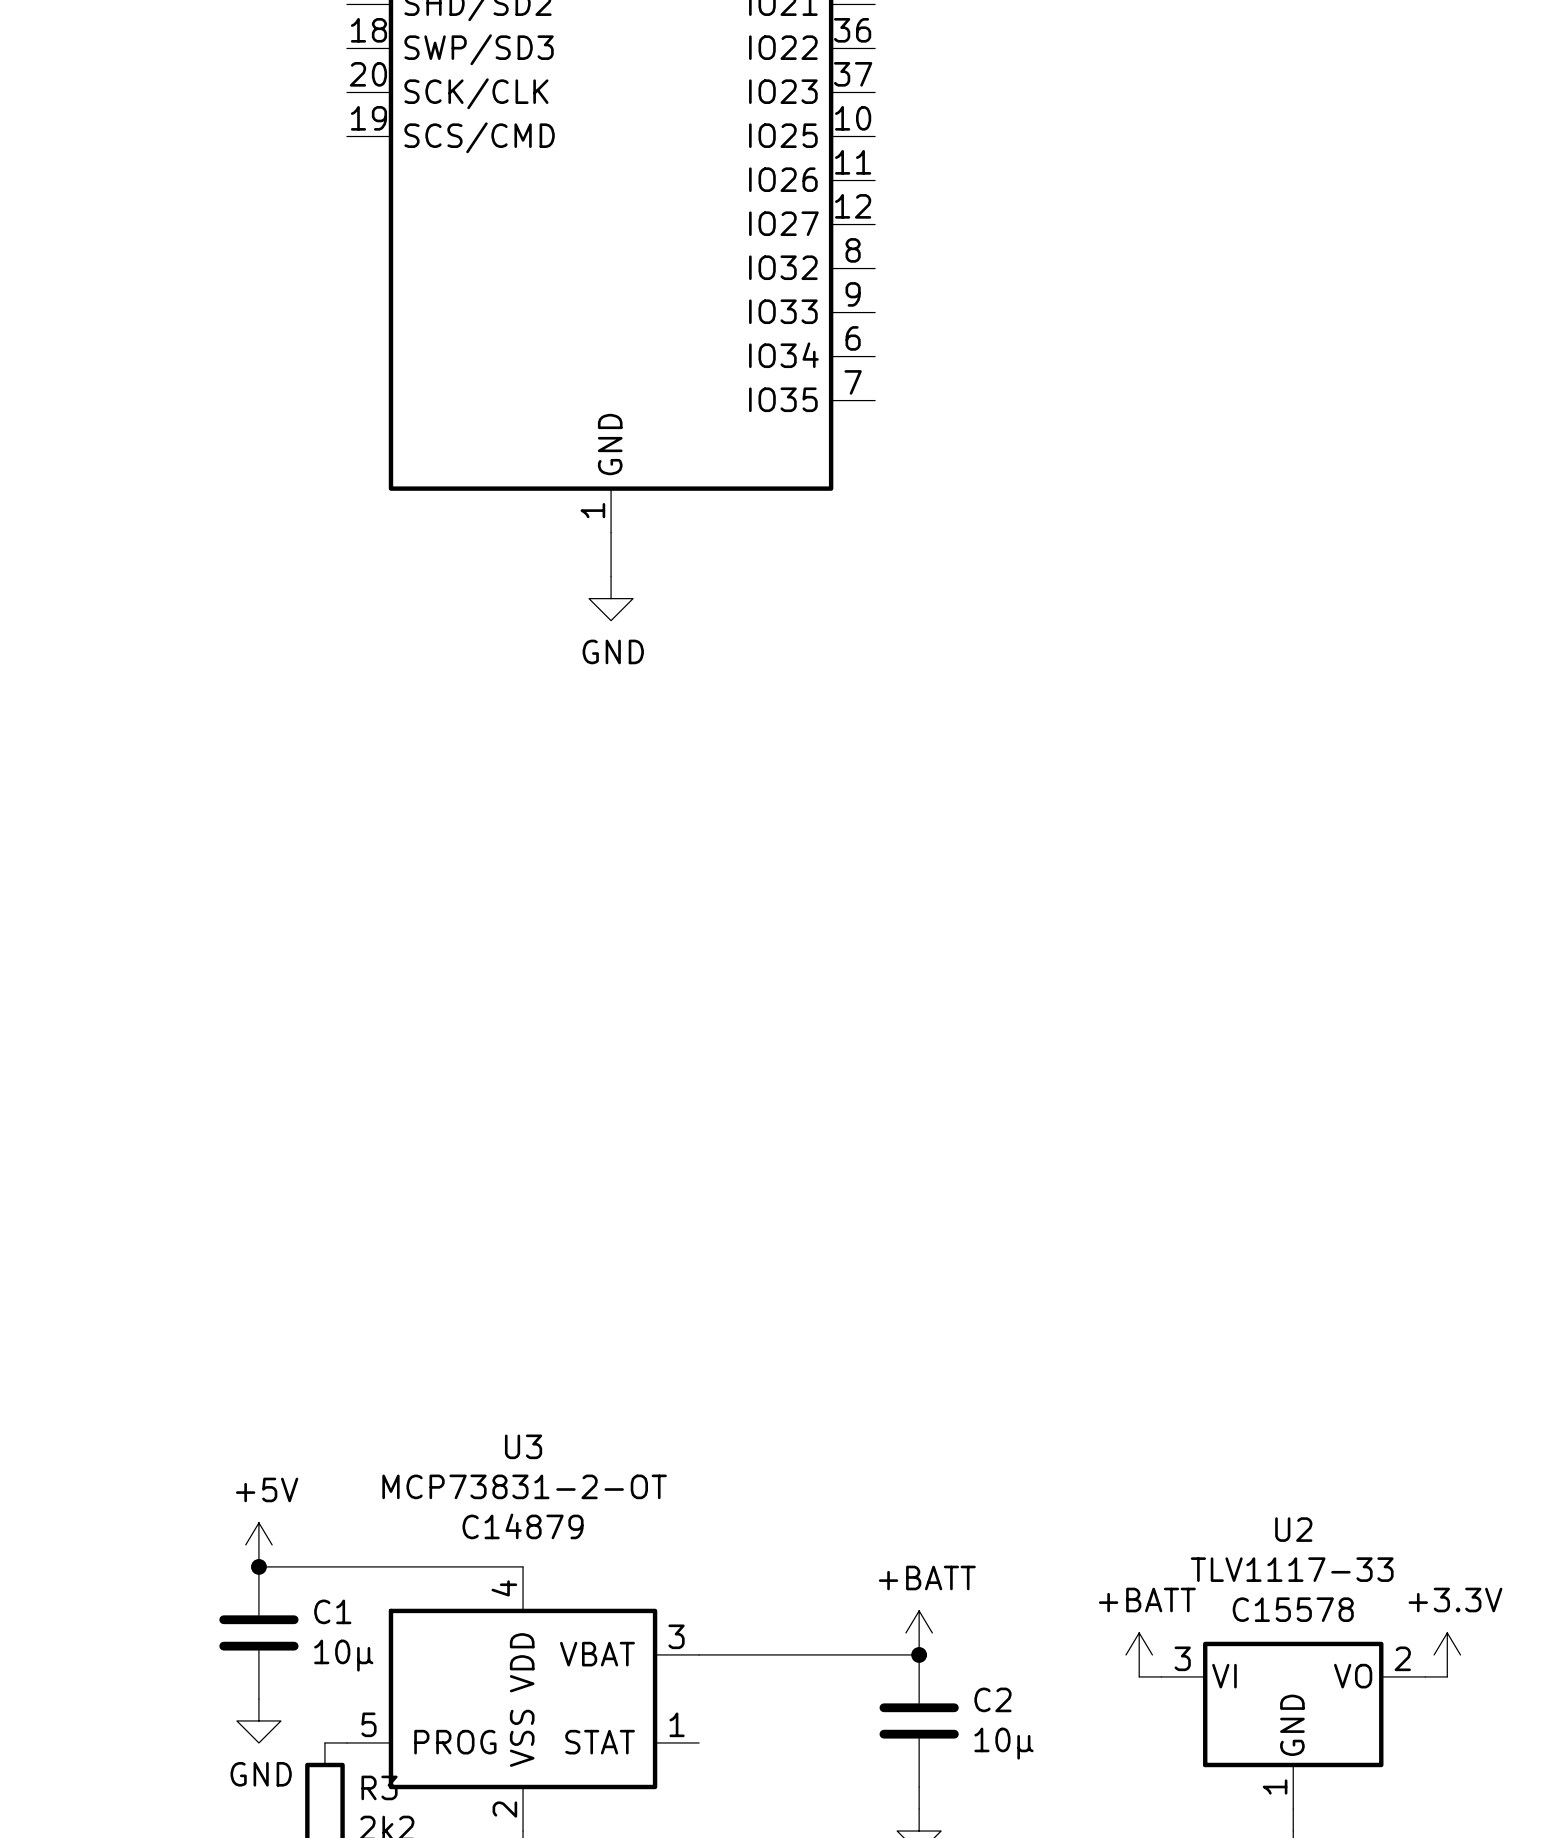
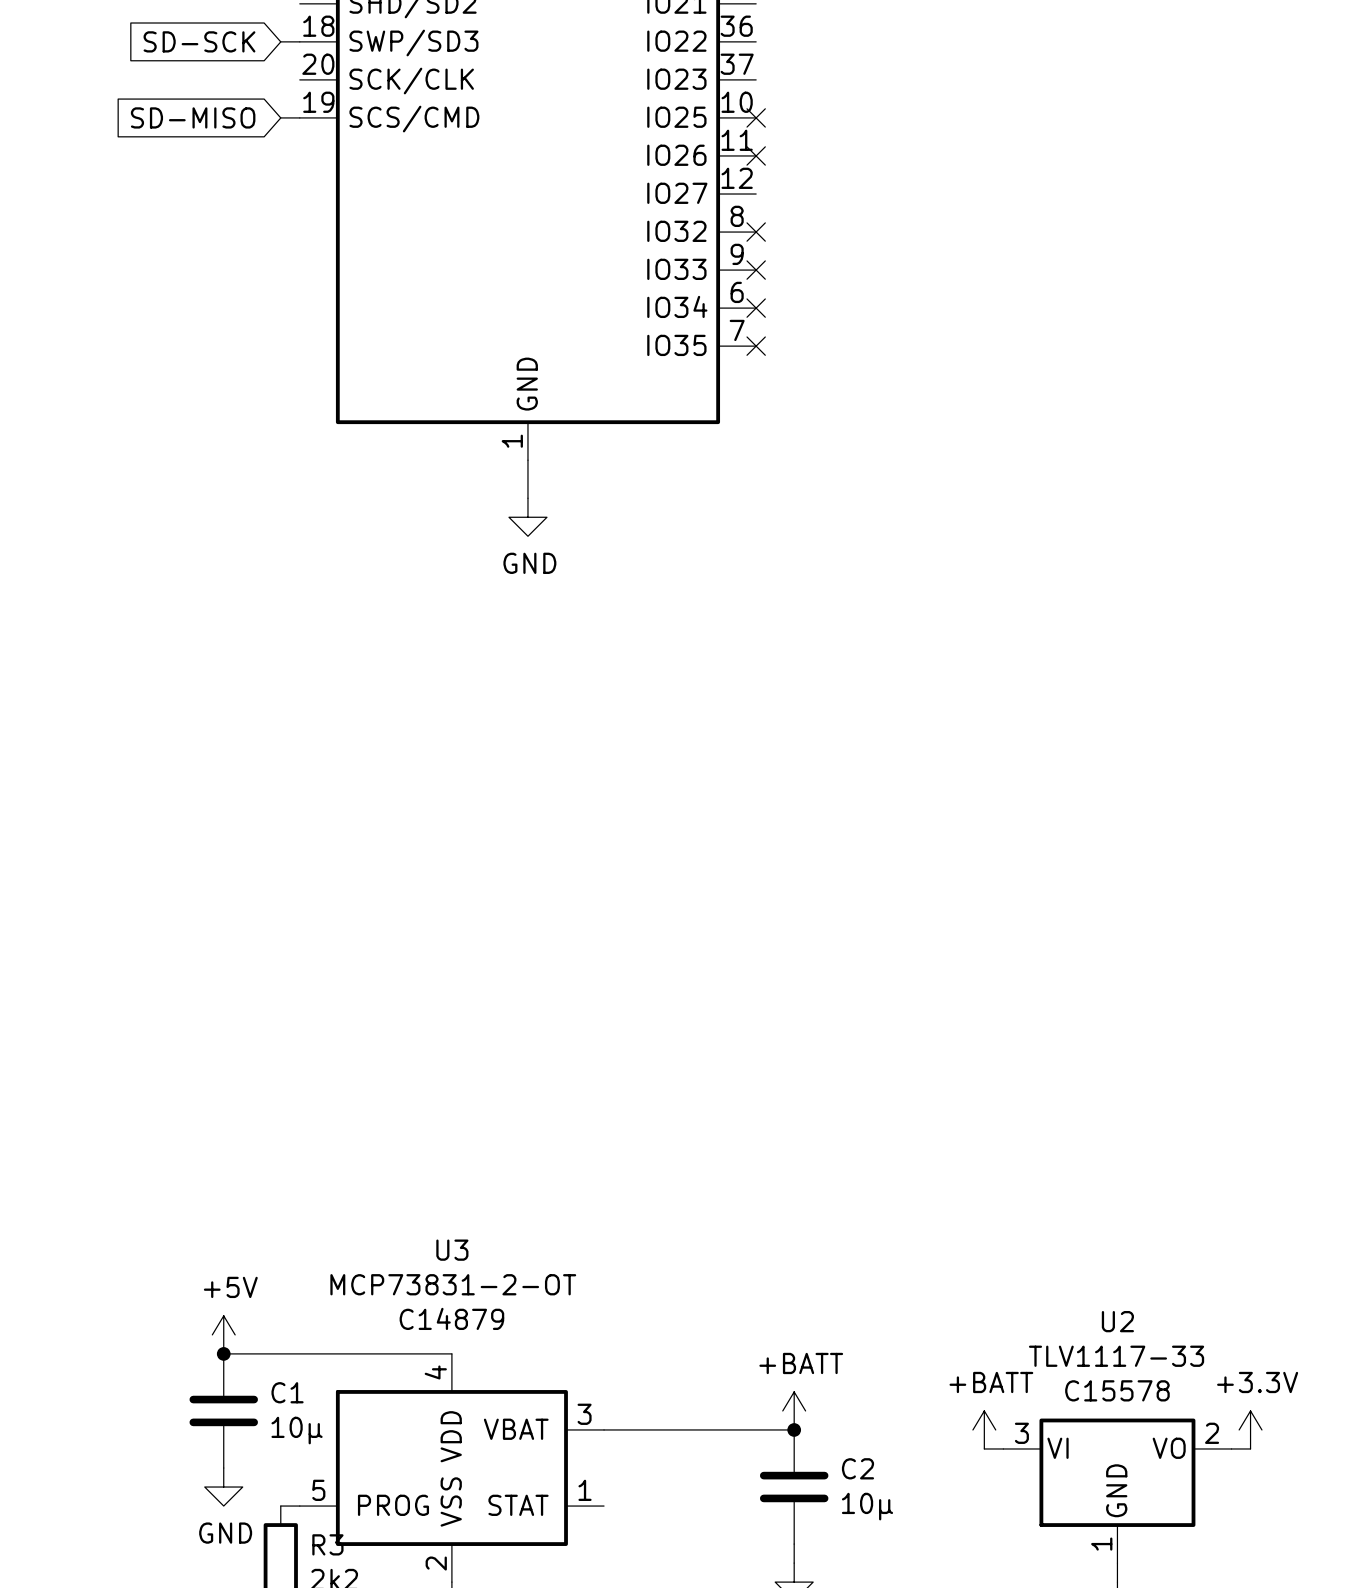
global label: none -> SD-SCK (199, 41)
wire: none -> (280, 41) (299, 41)
global label: none -> SD-MISO (193, 117)
wire: none -> (280, 117) (299, 117)
no-connect mark: none -> (756, 117)
no-connect mark: none -> (756, 155)
no-connect mark: none -> (756, 232)
no-connect mark: none -> (756, 270)
no-connect mark: none -> (756, 308)
no-connect mark: none -> (756, 346)

